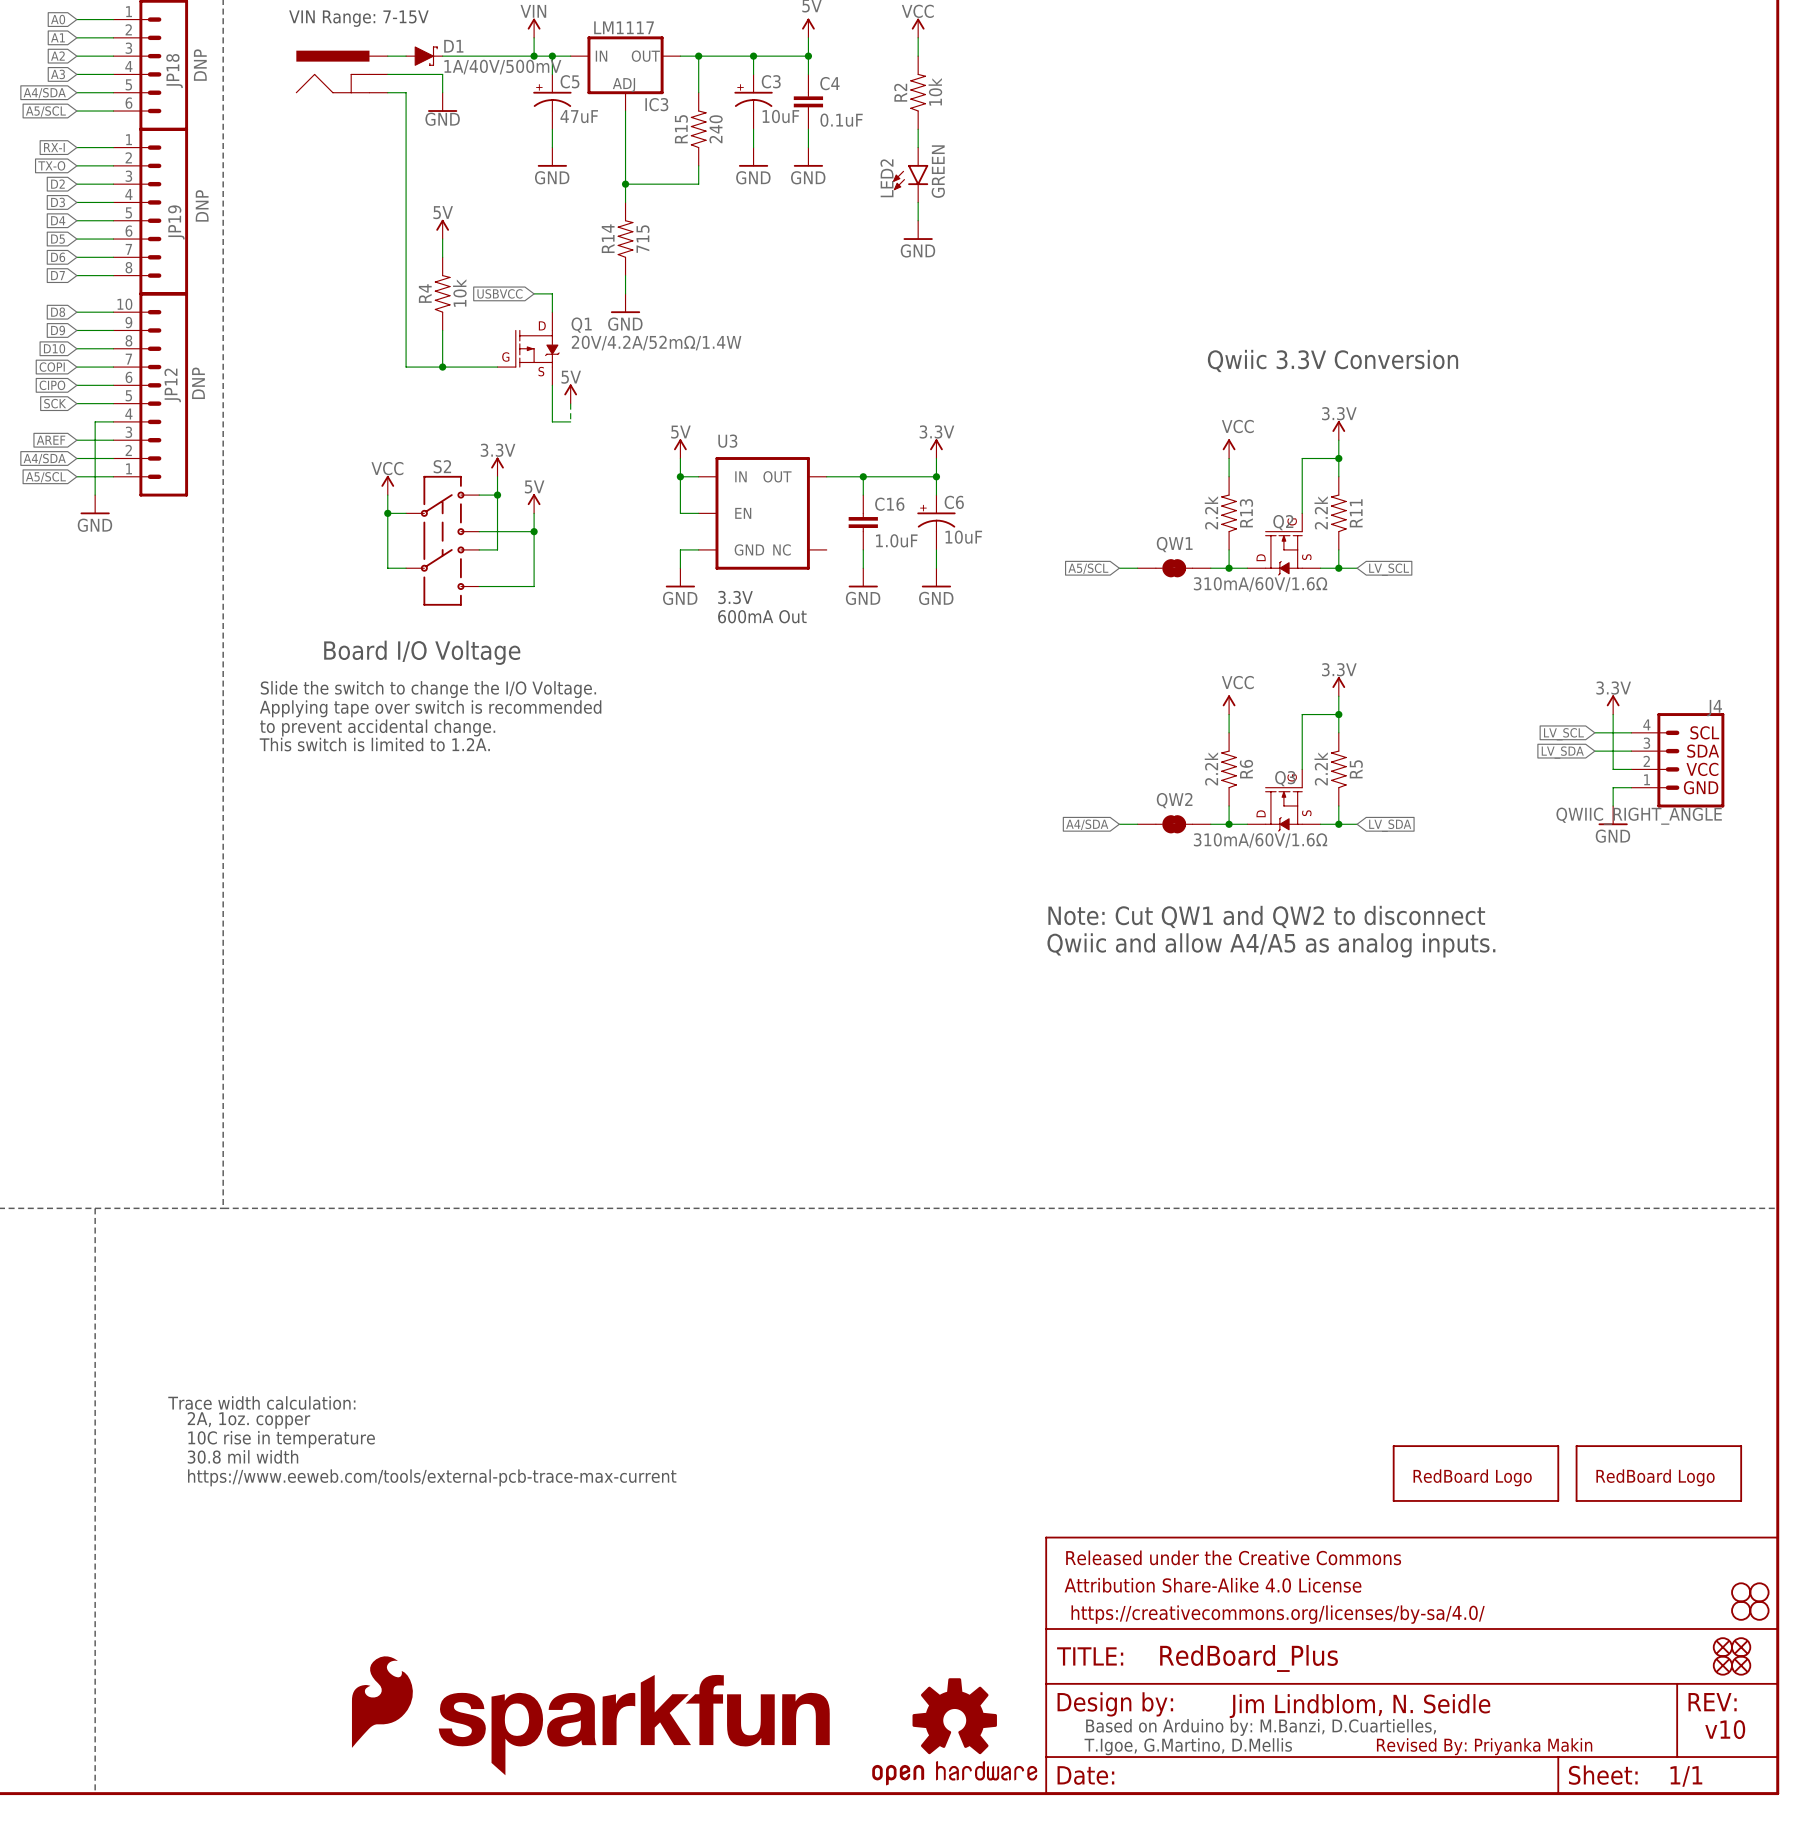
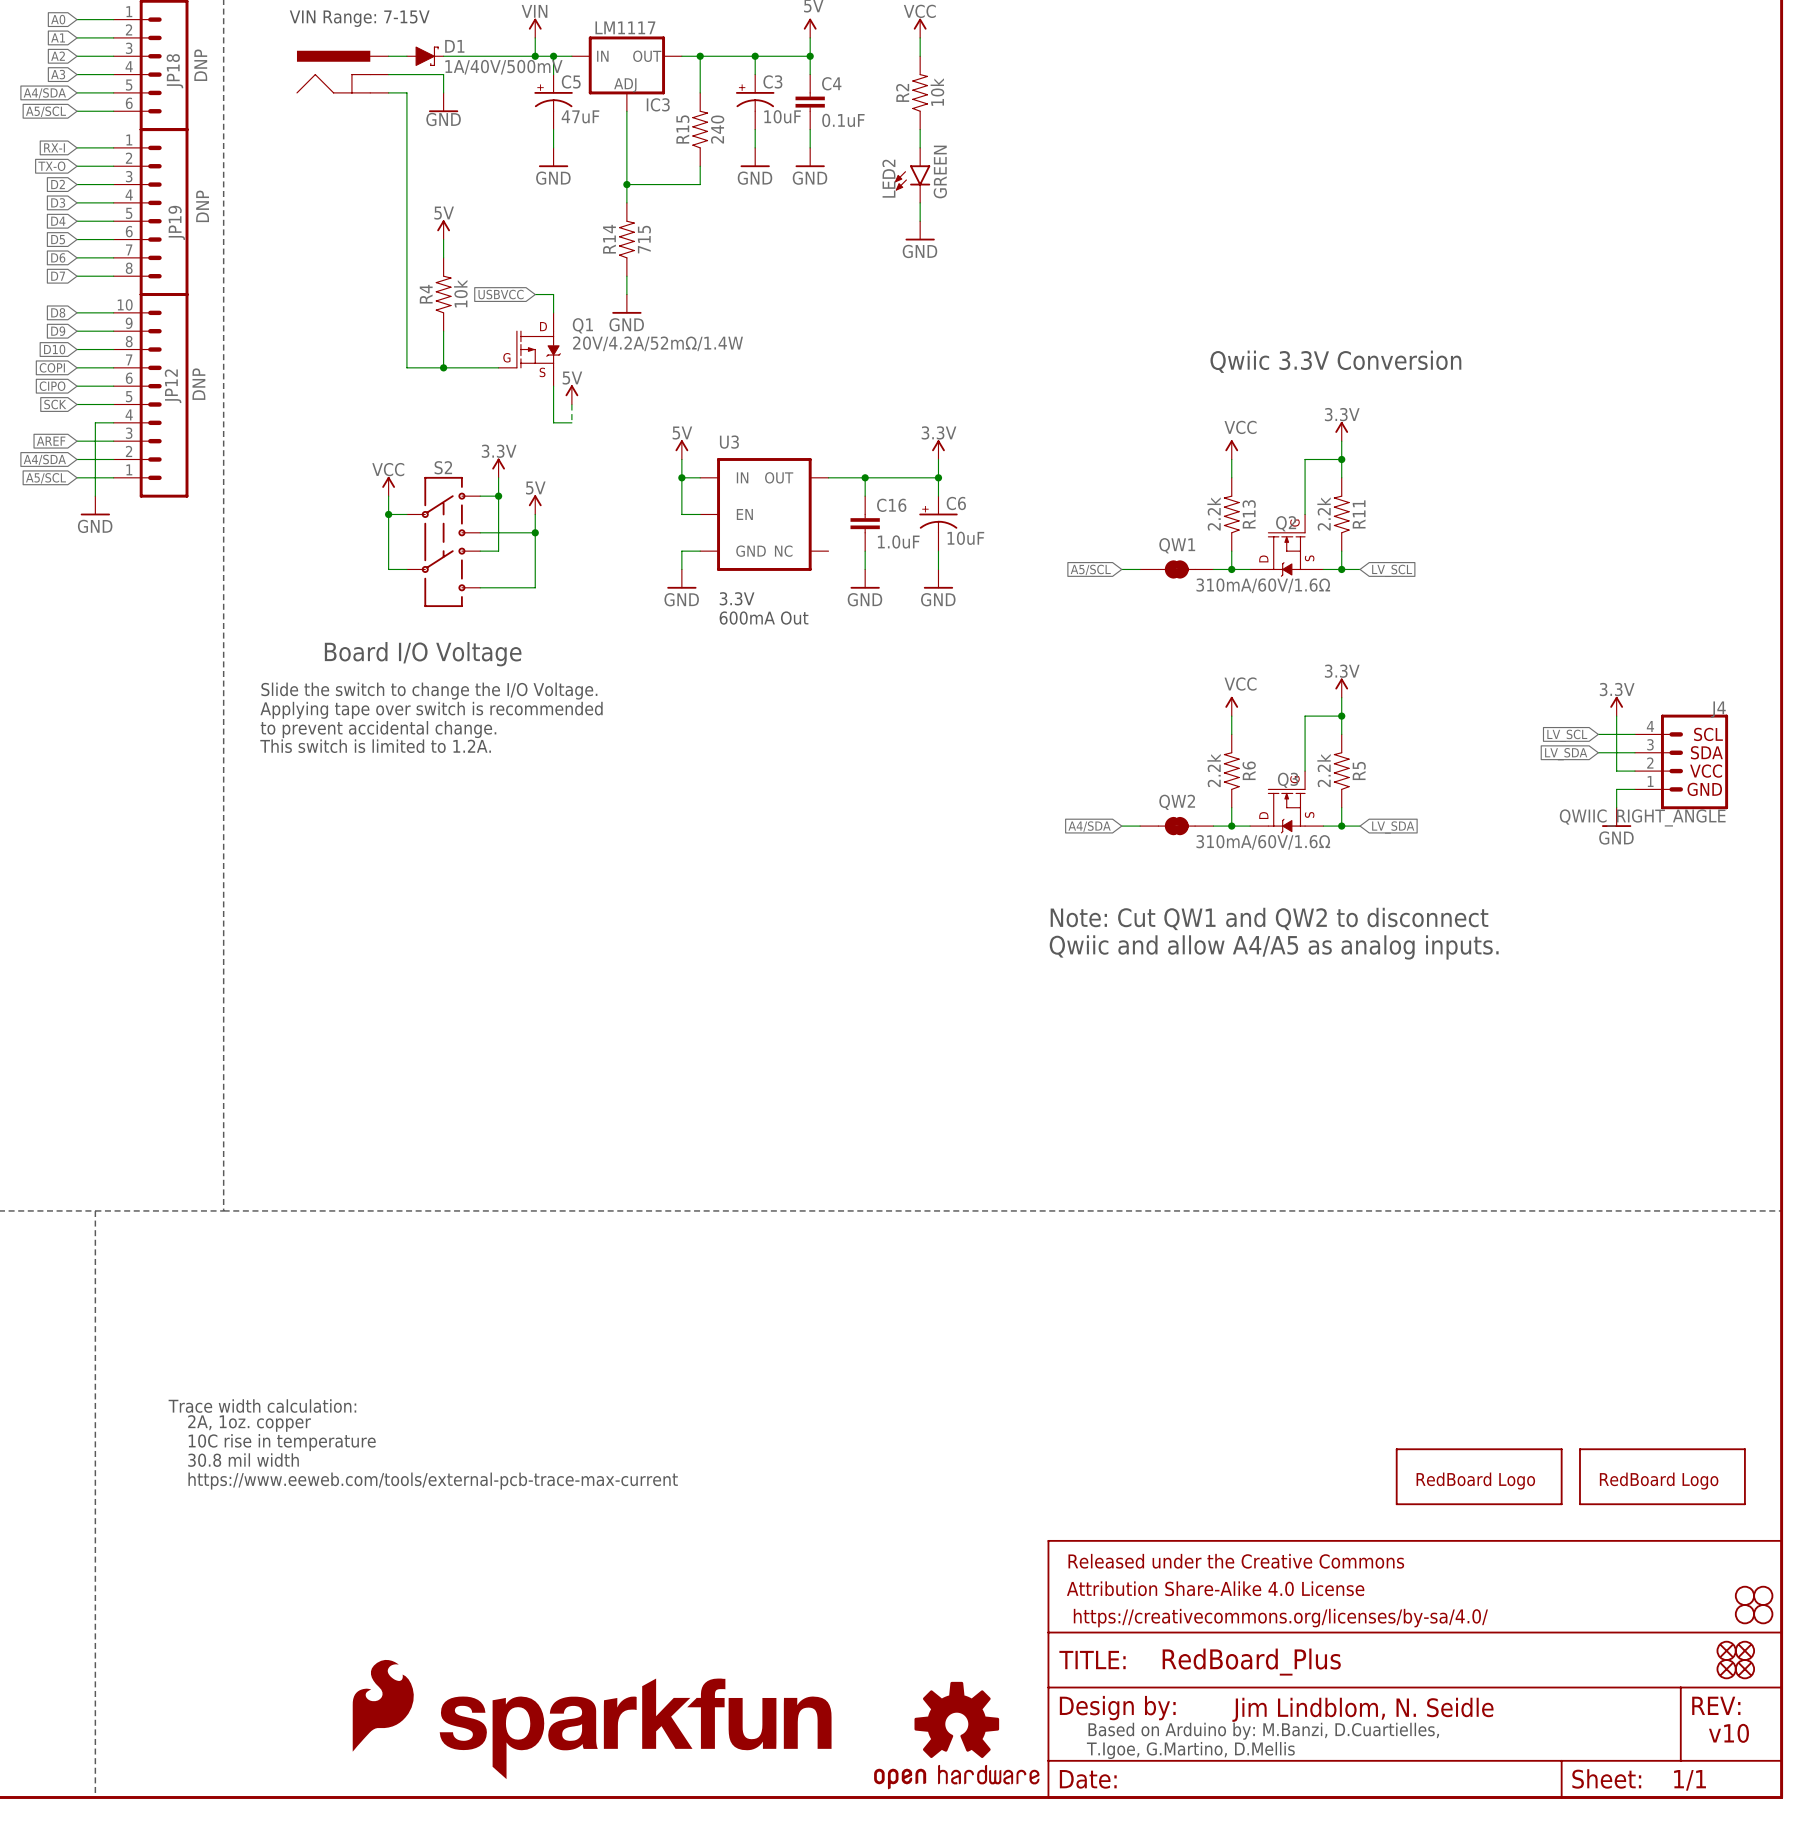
text: Revised By: Priyanka Makin (1484, 1746) -> none

